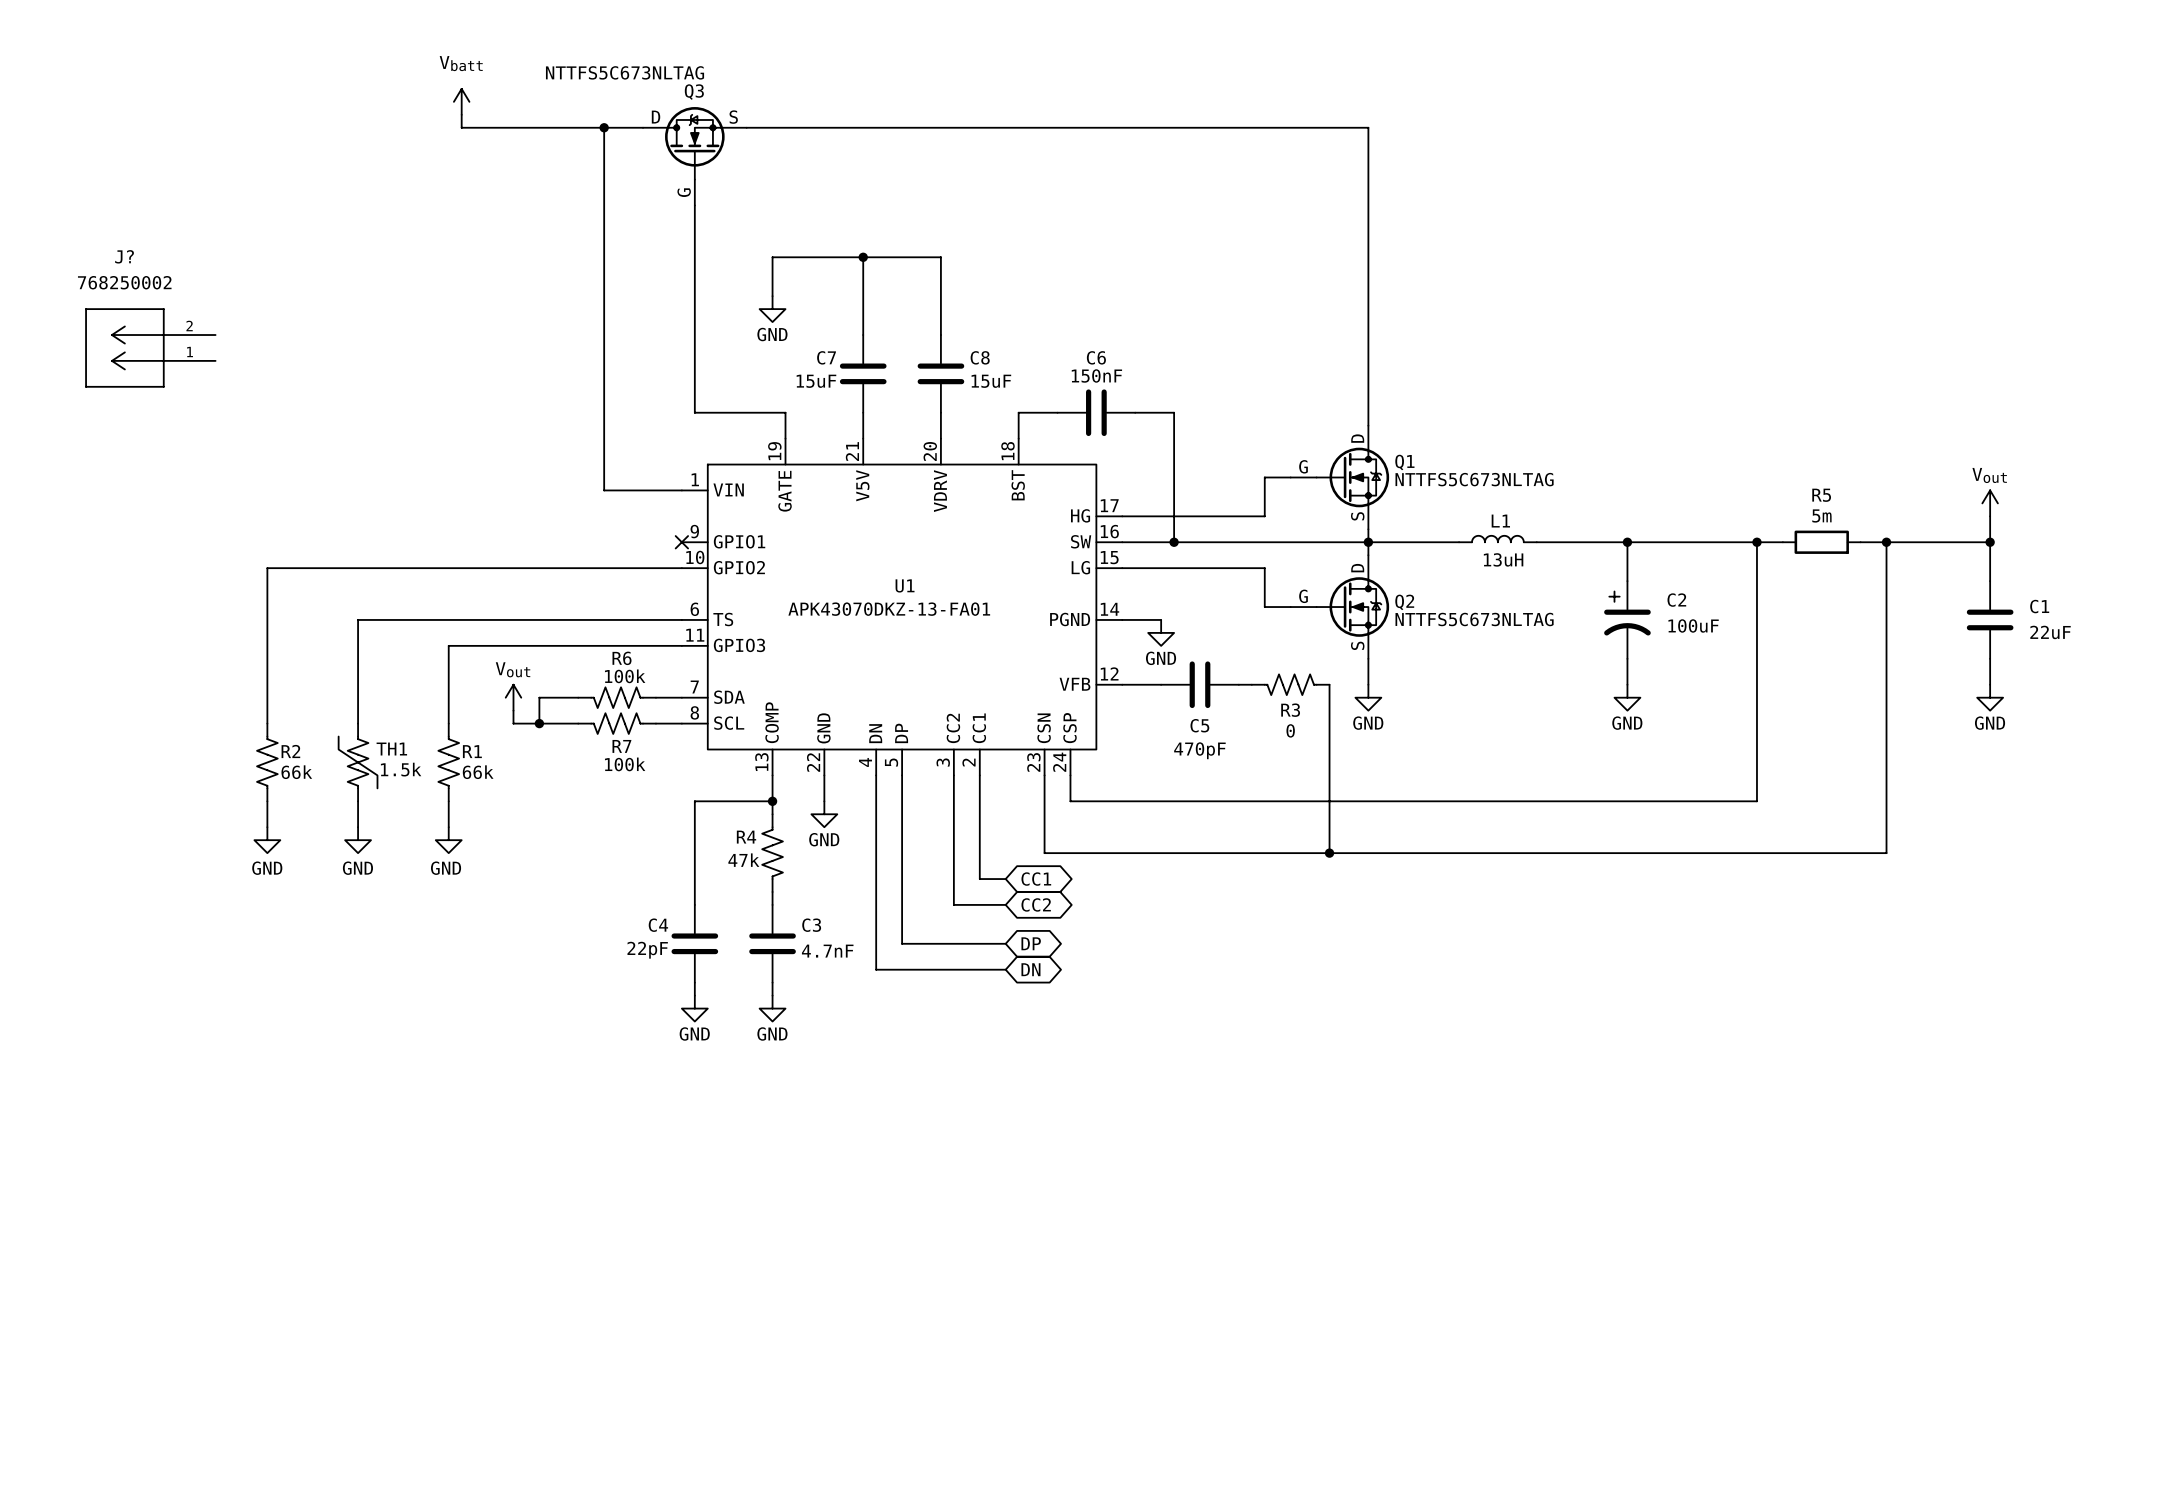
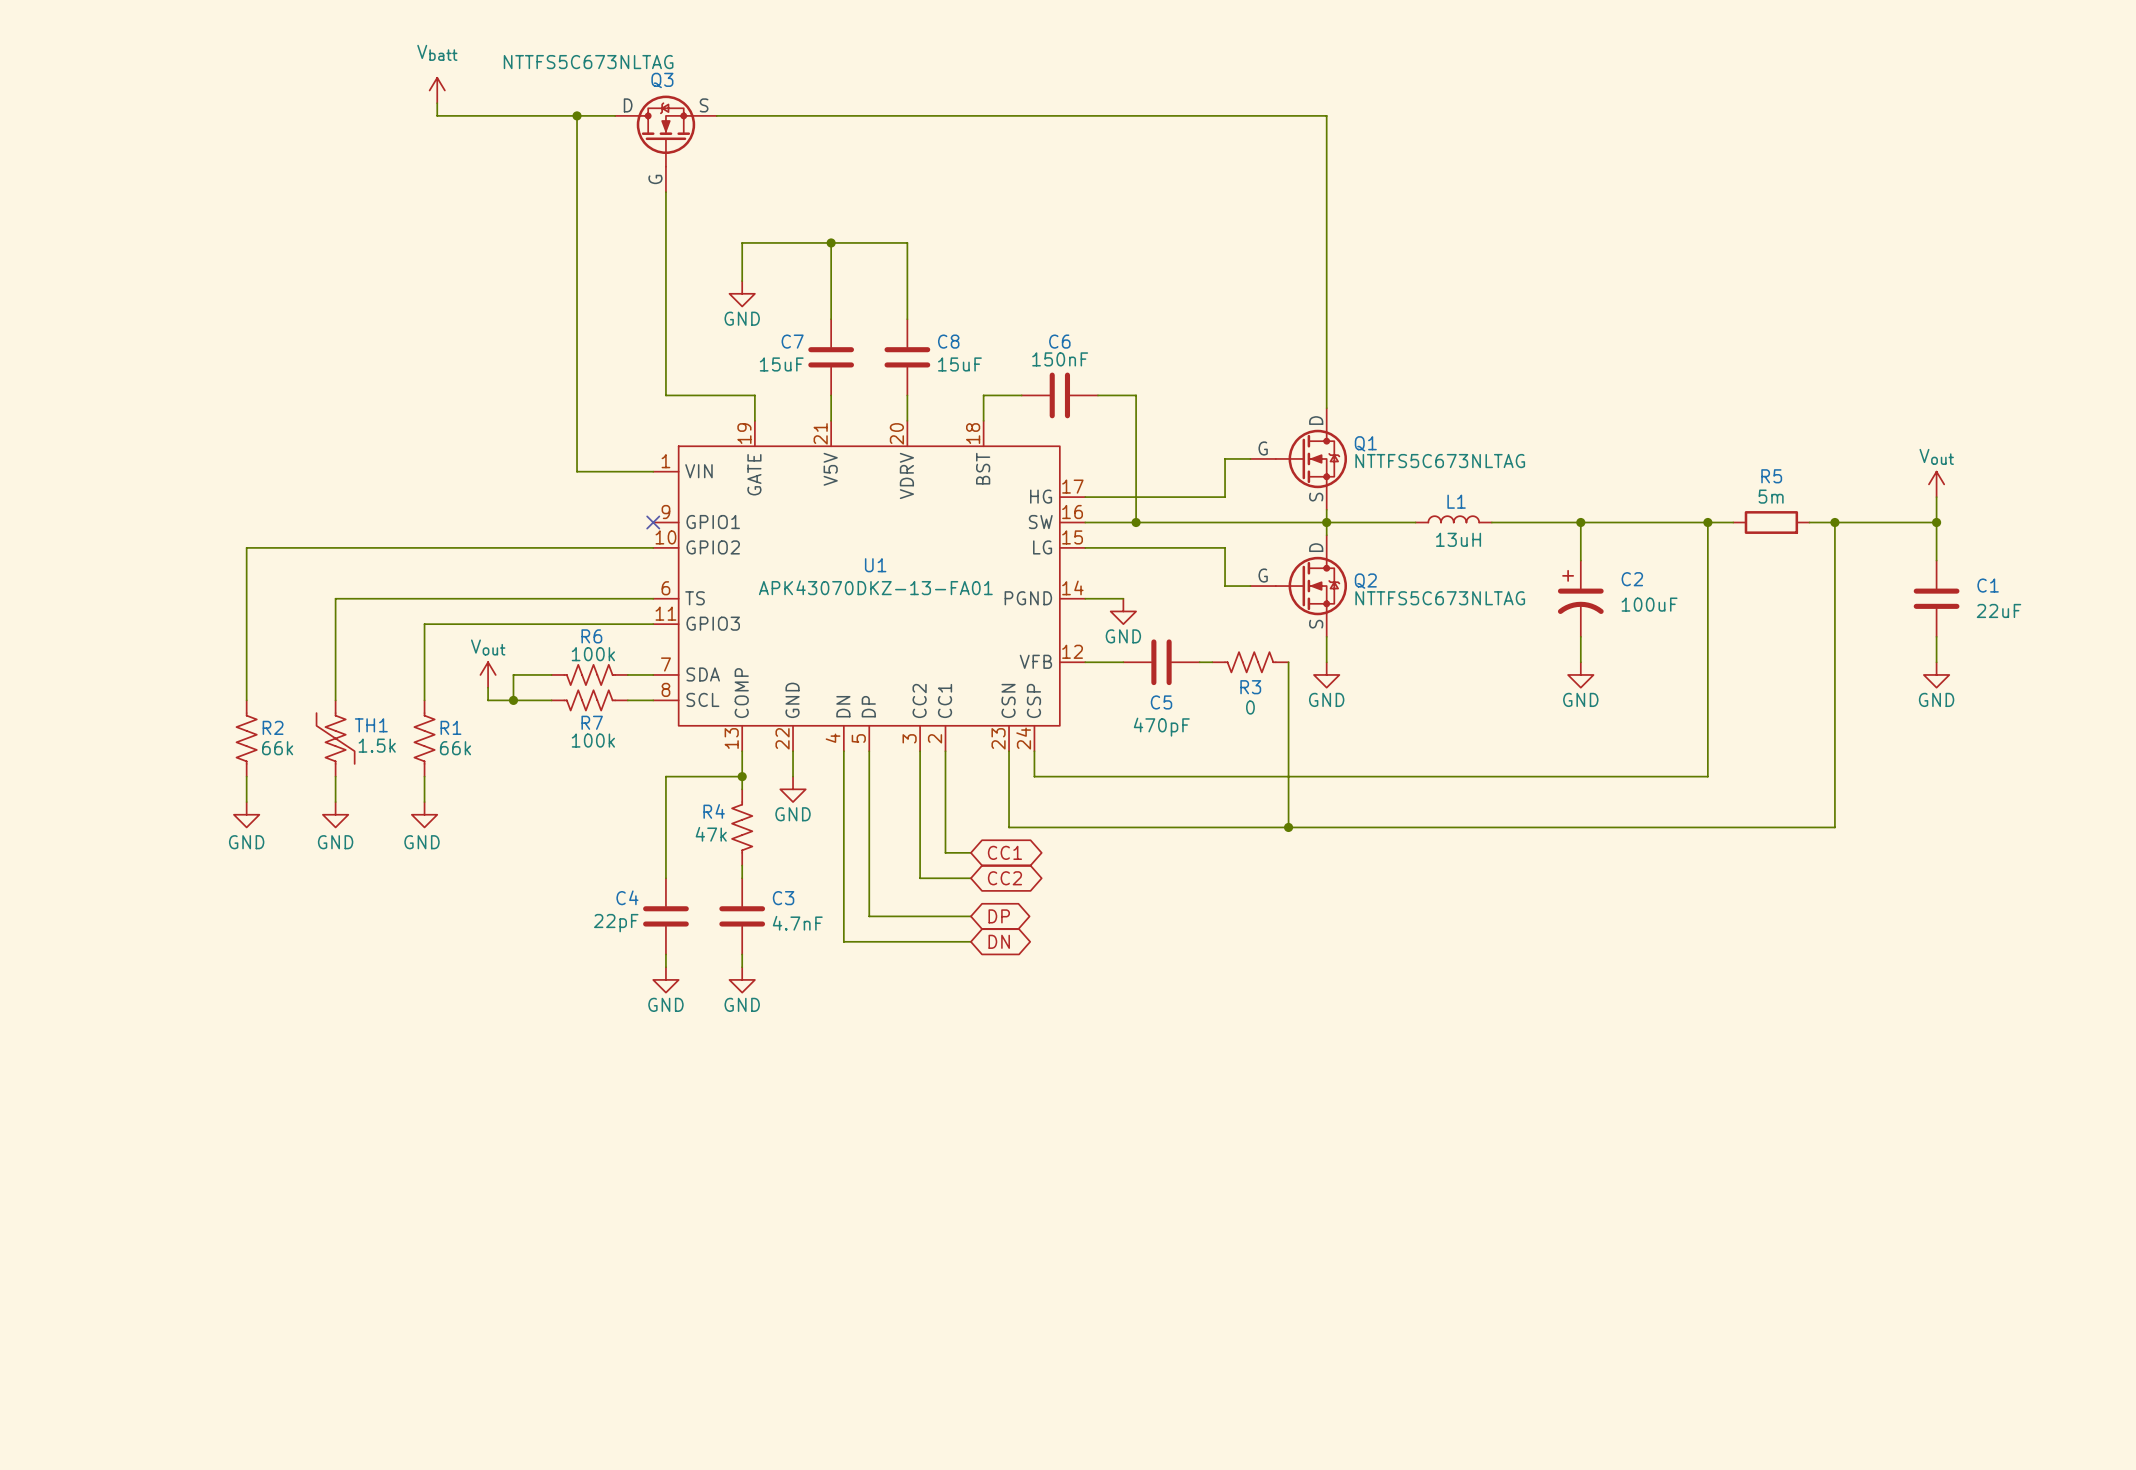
J?: 768250002 (150, 347) -> none

